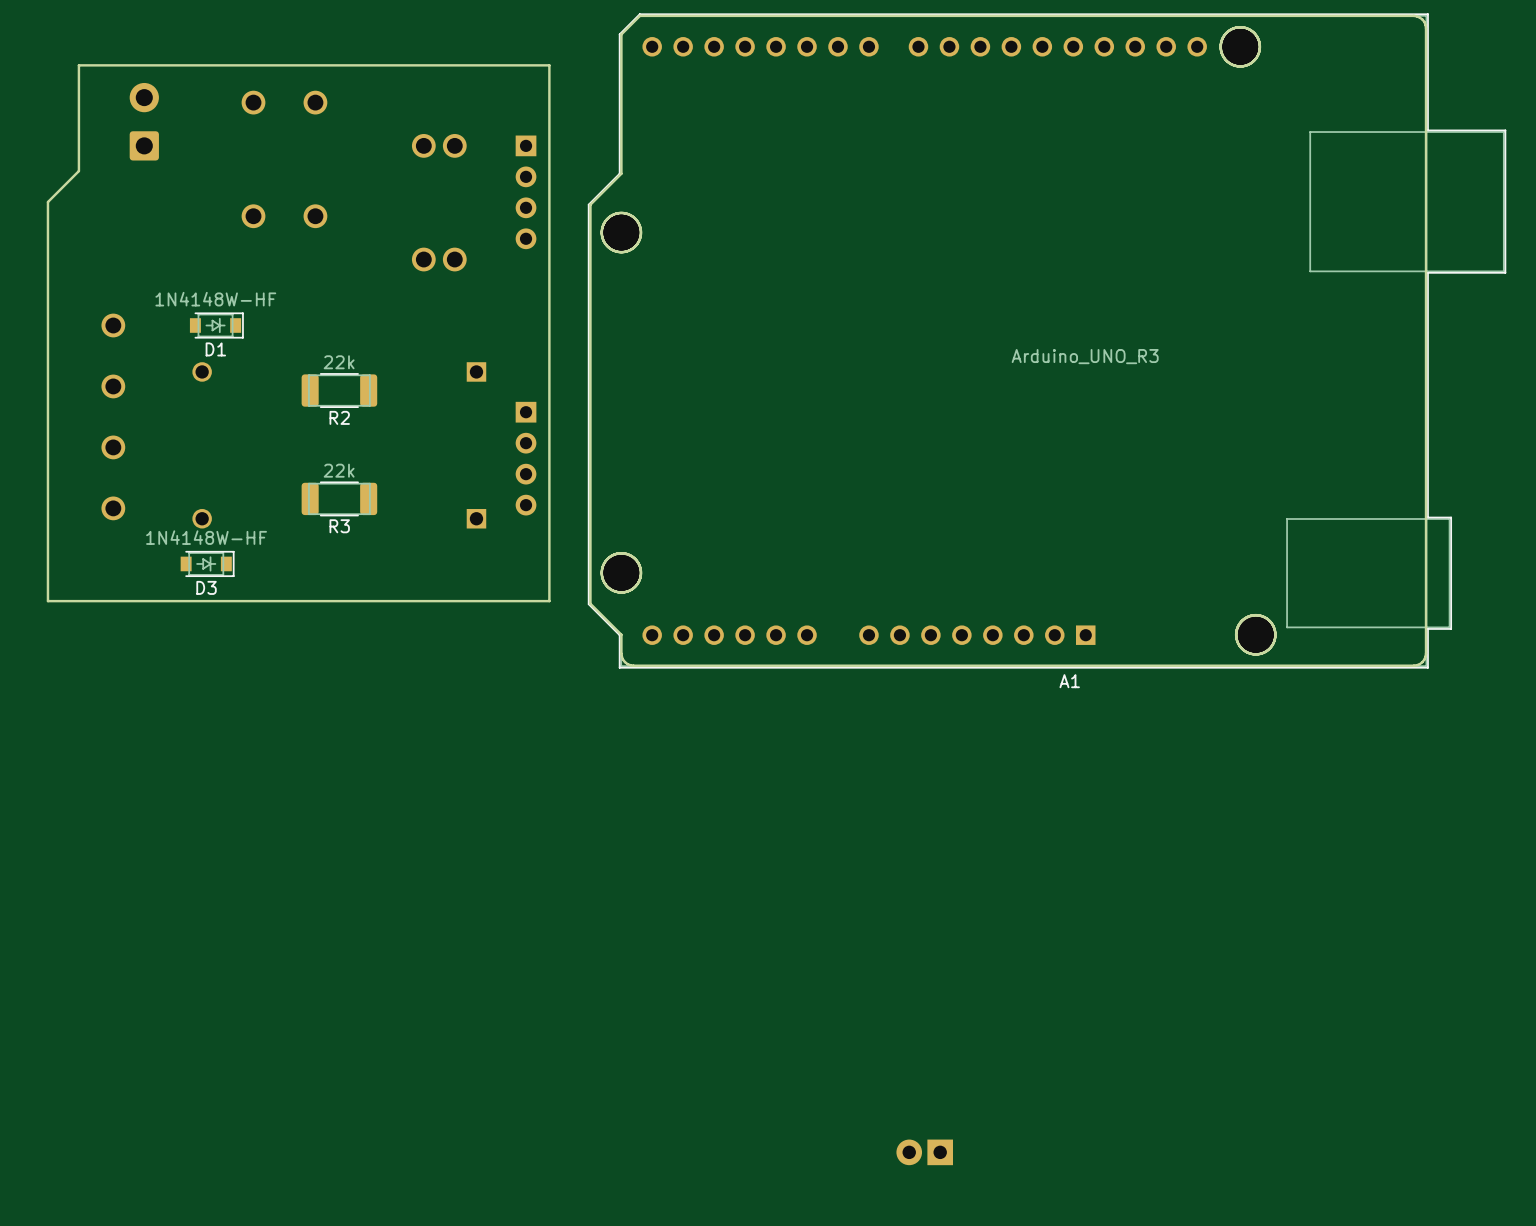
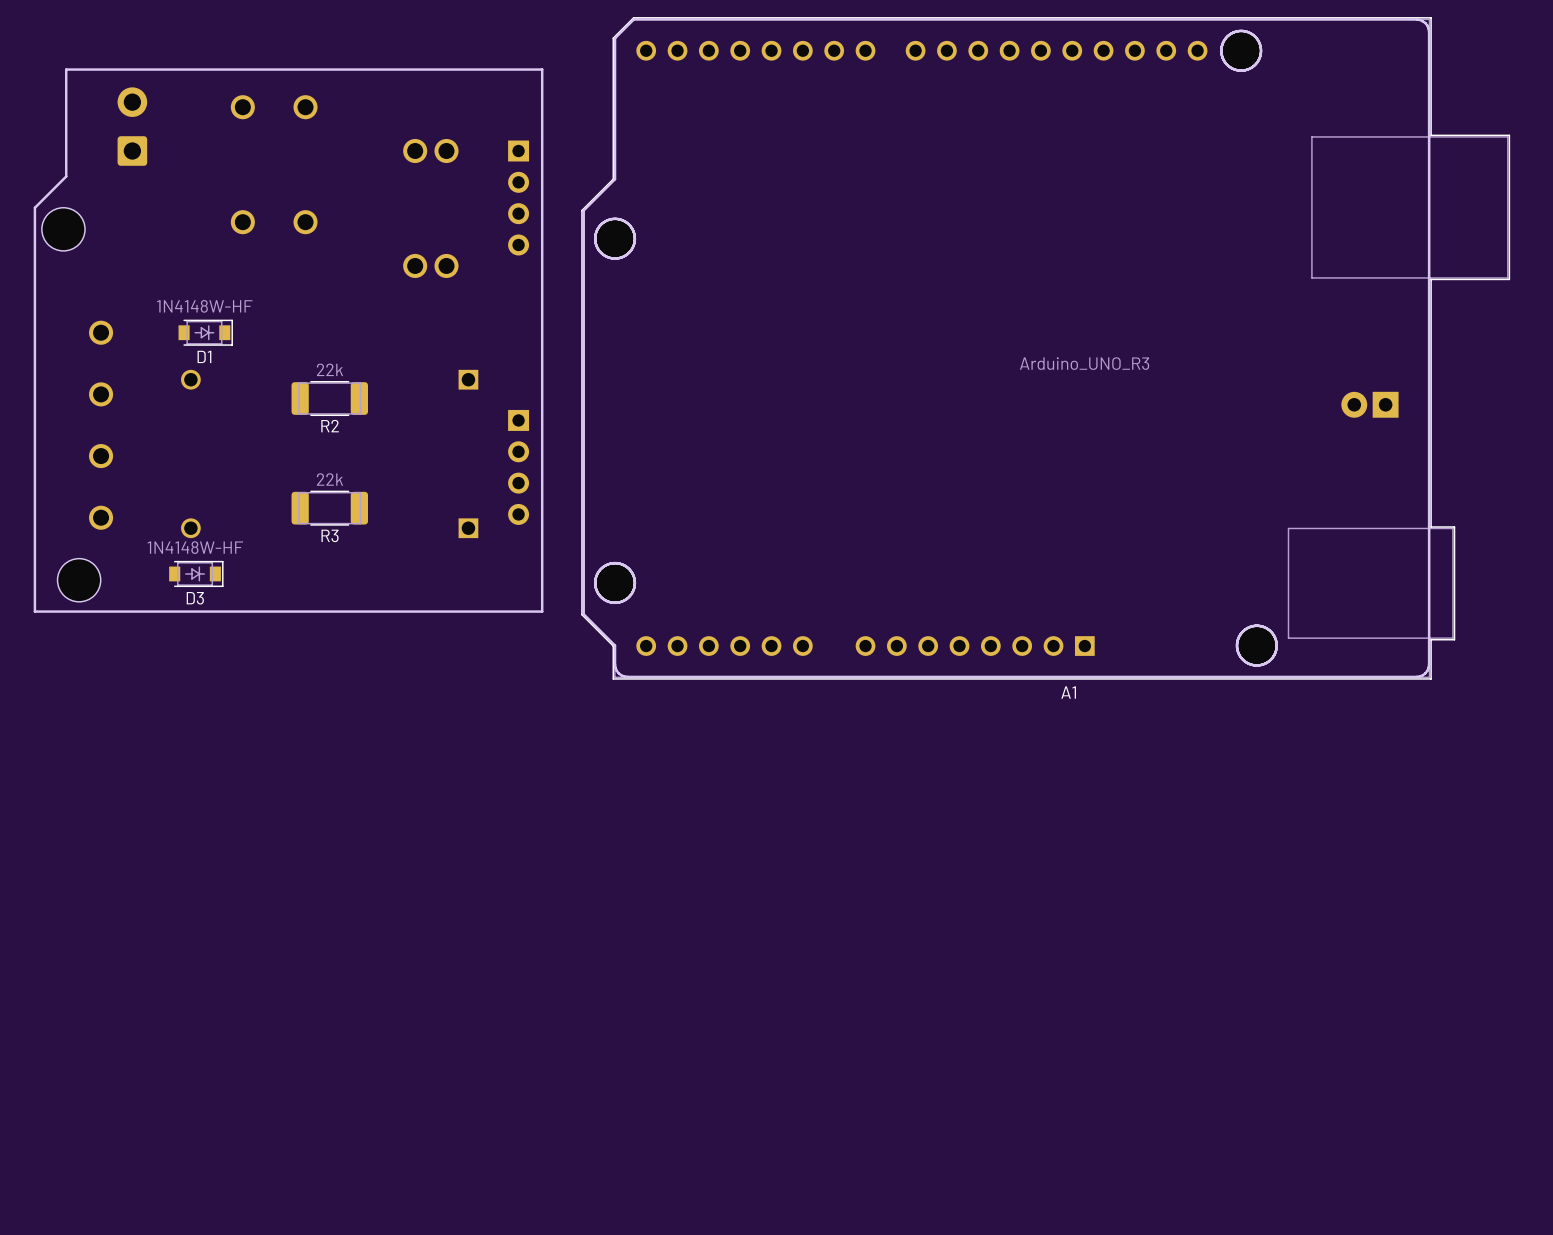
part: none -> (63, 229)
part: none -> (1369, 404)
part: none -> (79, 580)
part: (924, 1152) -> none

